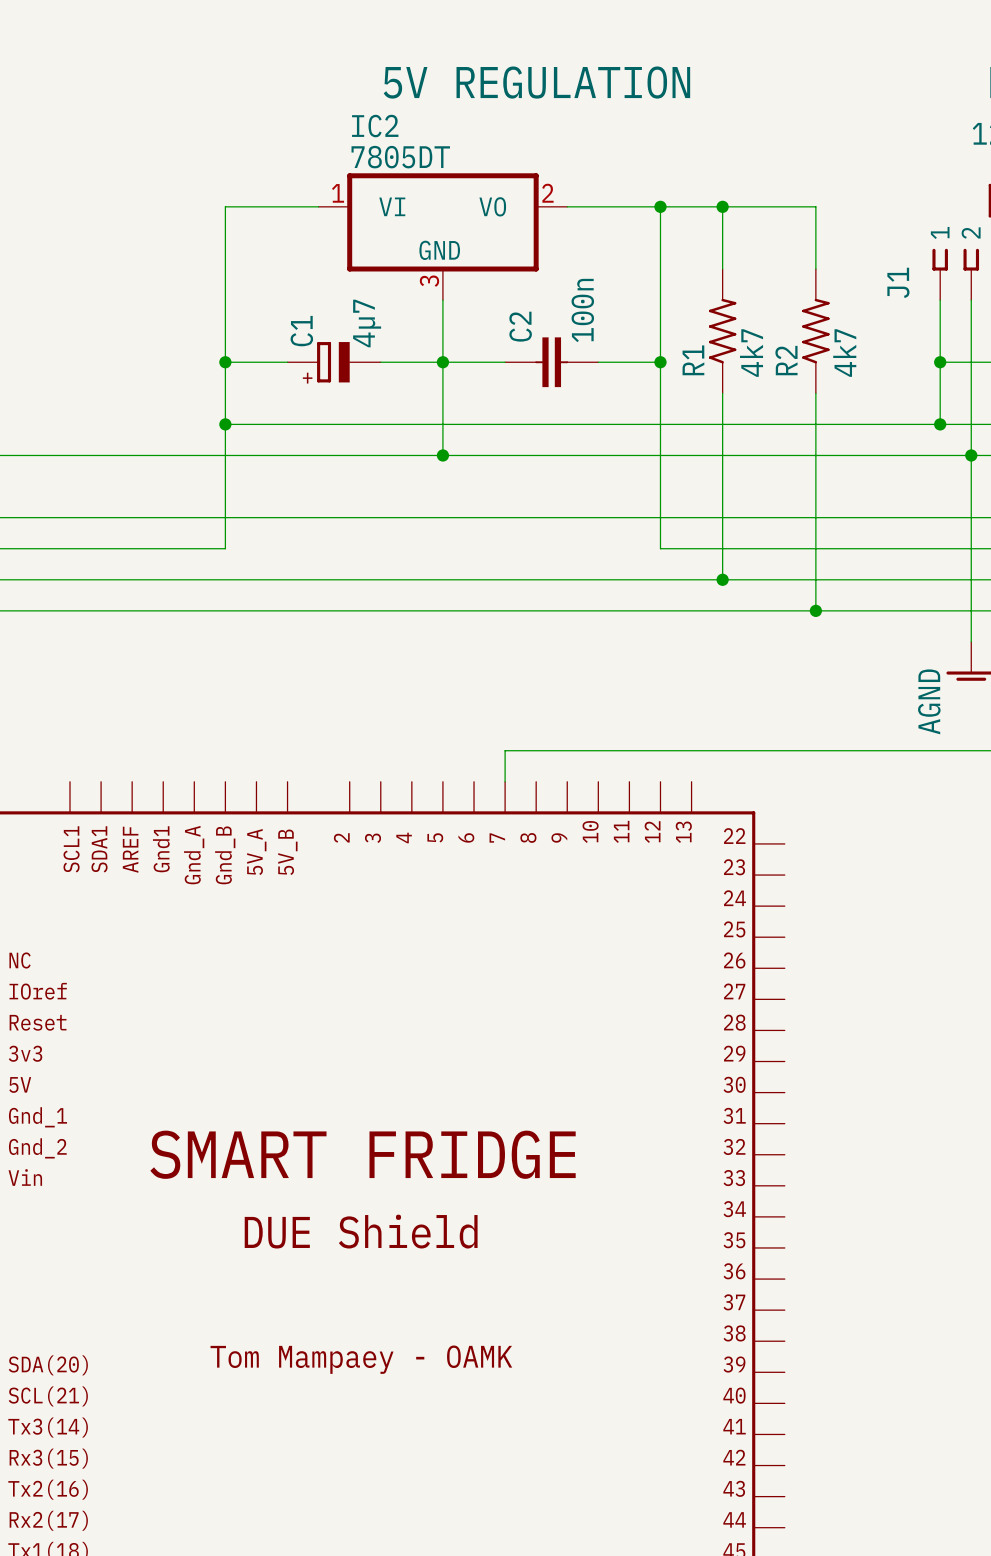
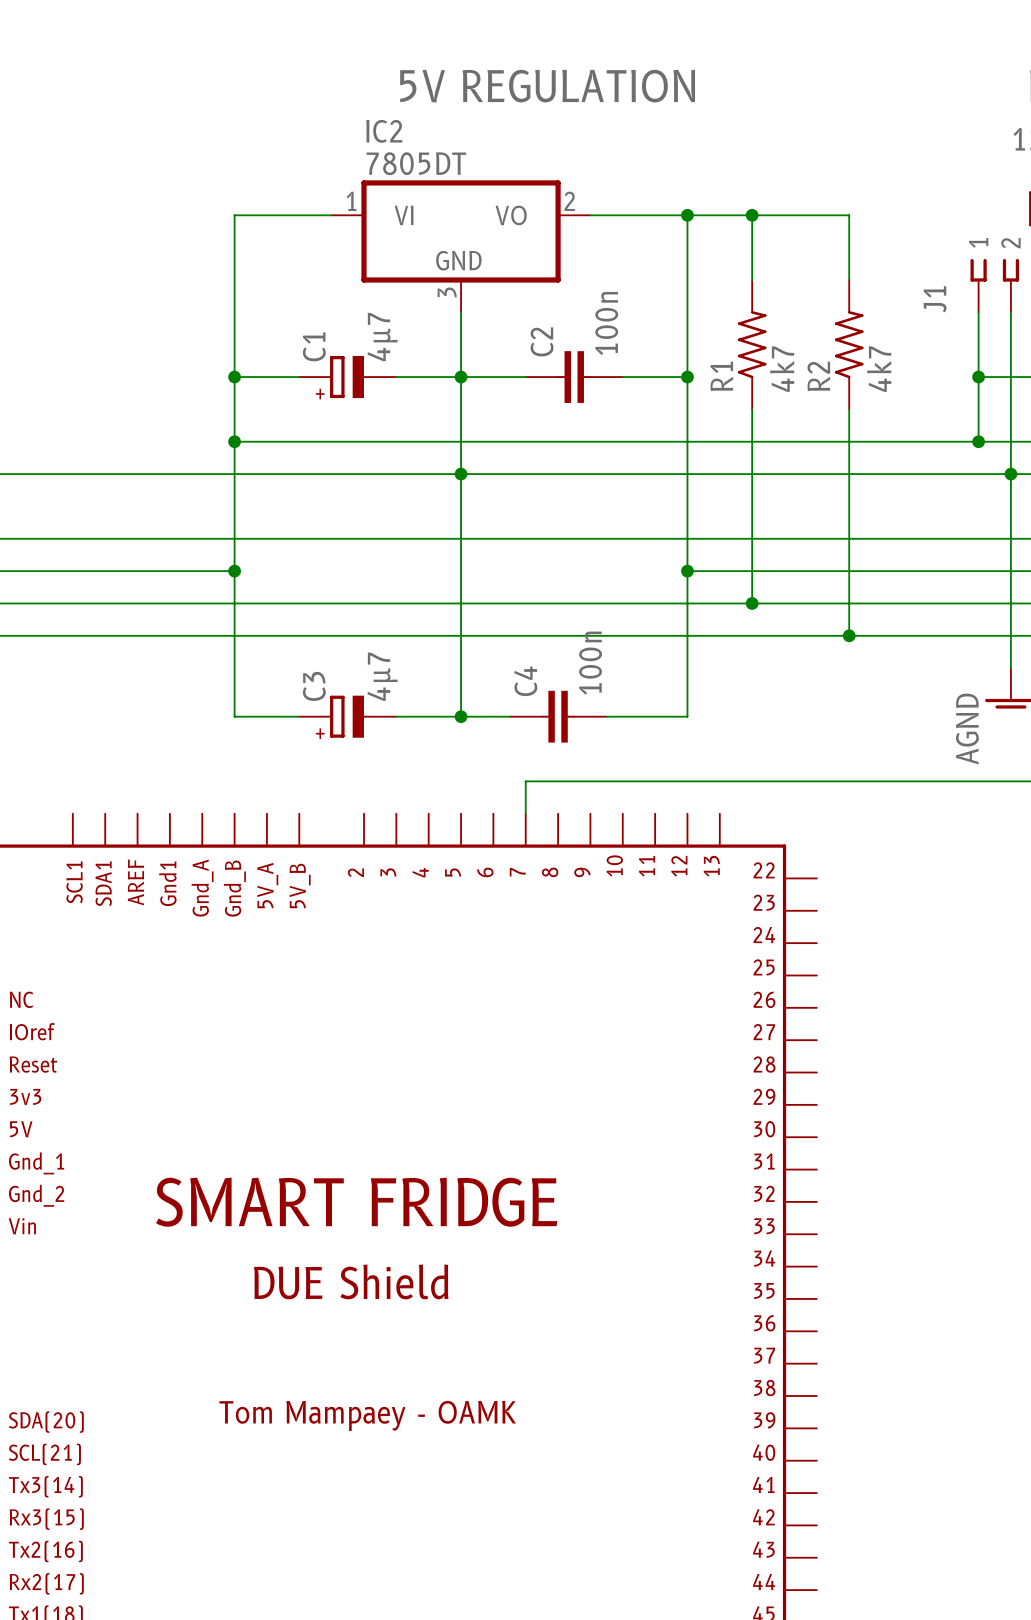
wire: none -> (461, 474) (461, 716)
wire: none -> (234, 571) (234, 716) (299, 716)
junction: none -> (234, 571)
wire: none -> (687, 571) (687, 716) (606, 716)
junction: none -> (687, 571)
C3: none -> 4µ7 (347, 716)
wire: none -> (396, 716) (509, 716)
junction: none -> (461, 716)
C4: none -> 100n (558, 716)

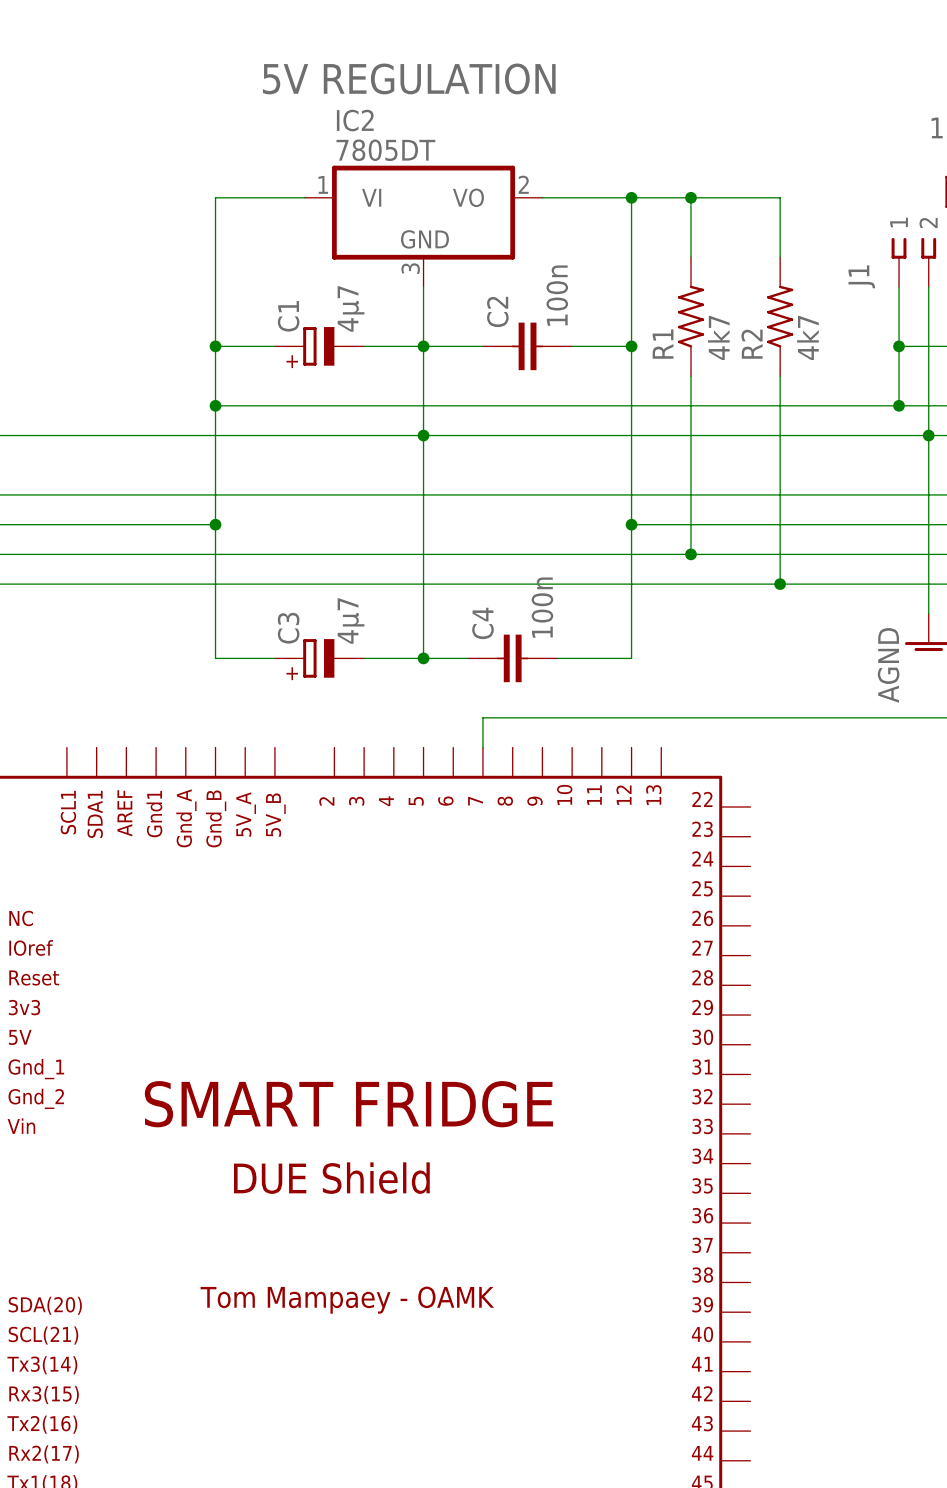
text position: 5V REGULATION (547, 86) -> 5V REGULATION (409, 78)

